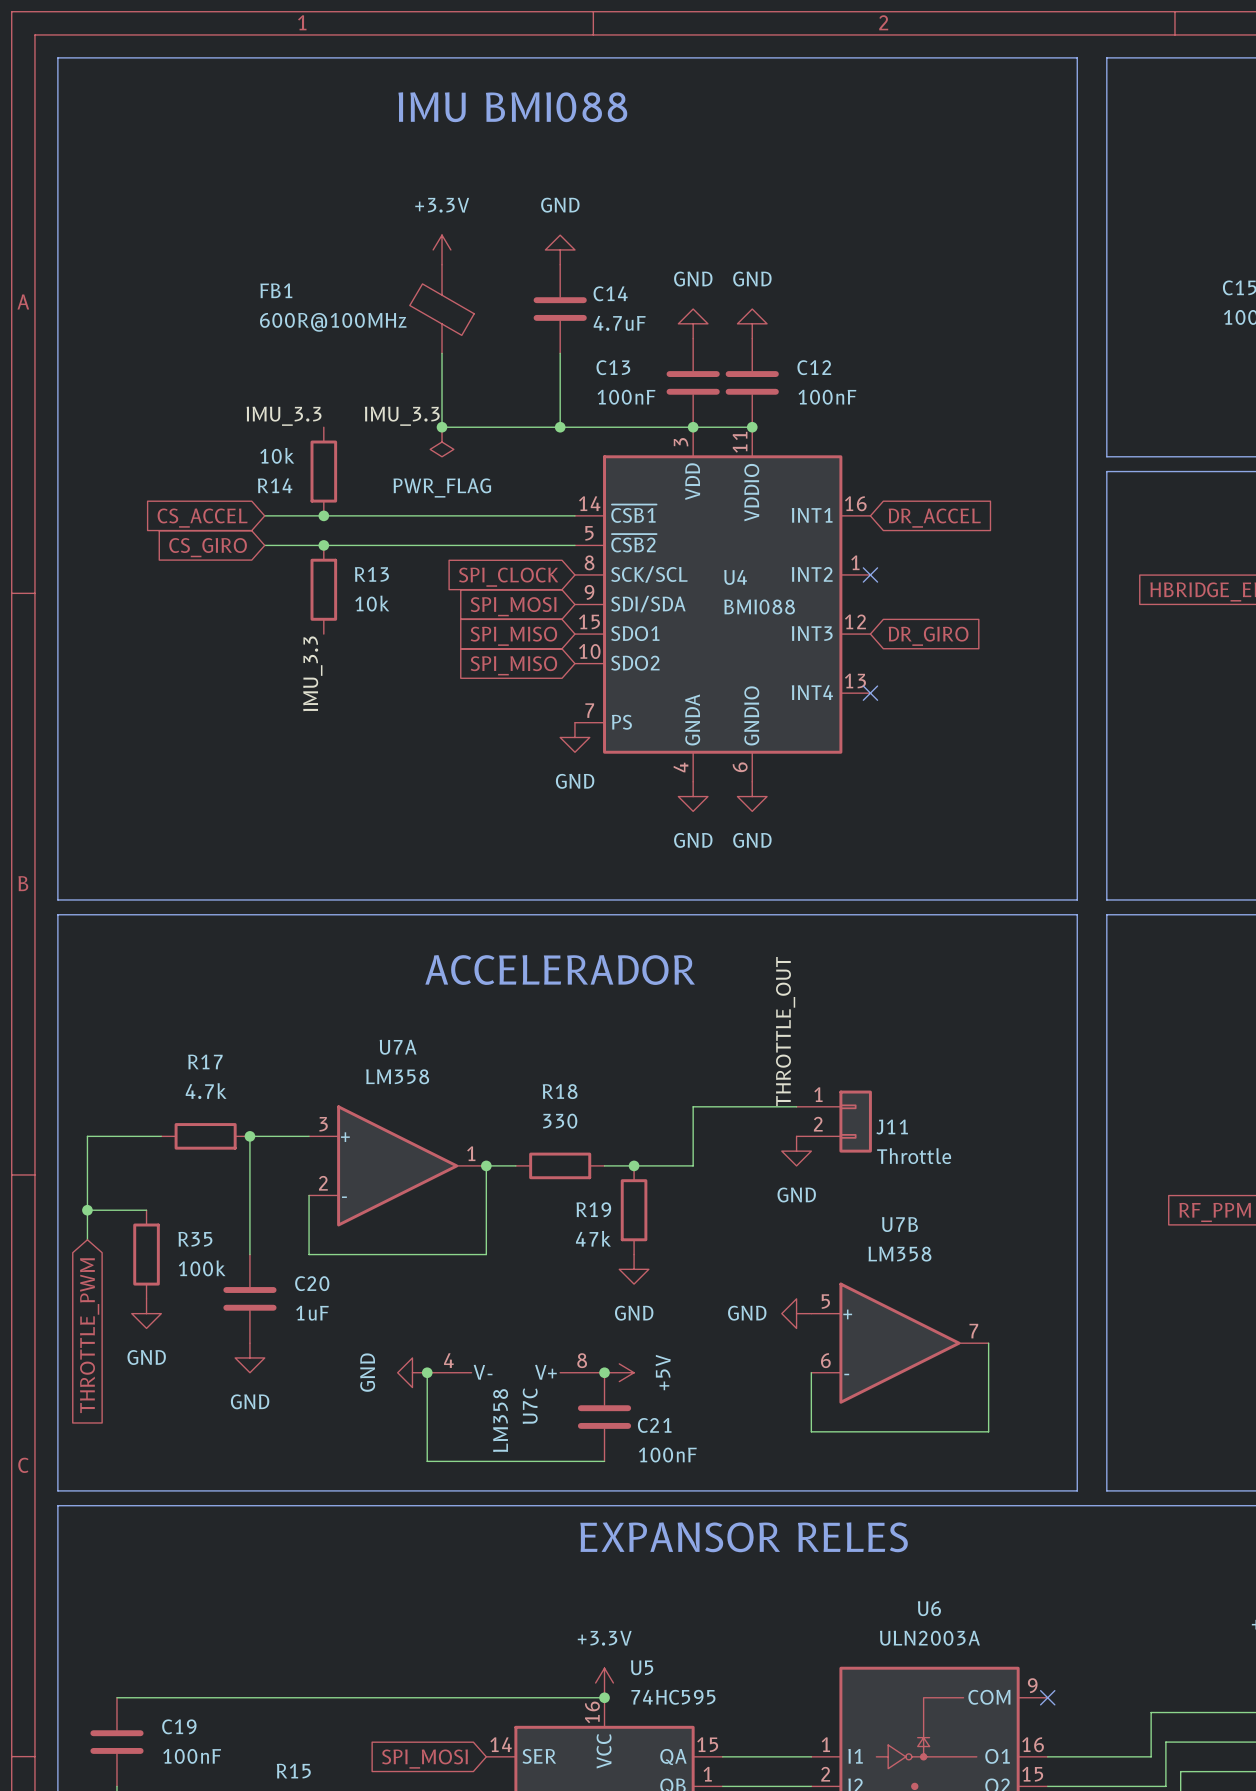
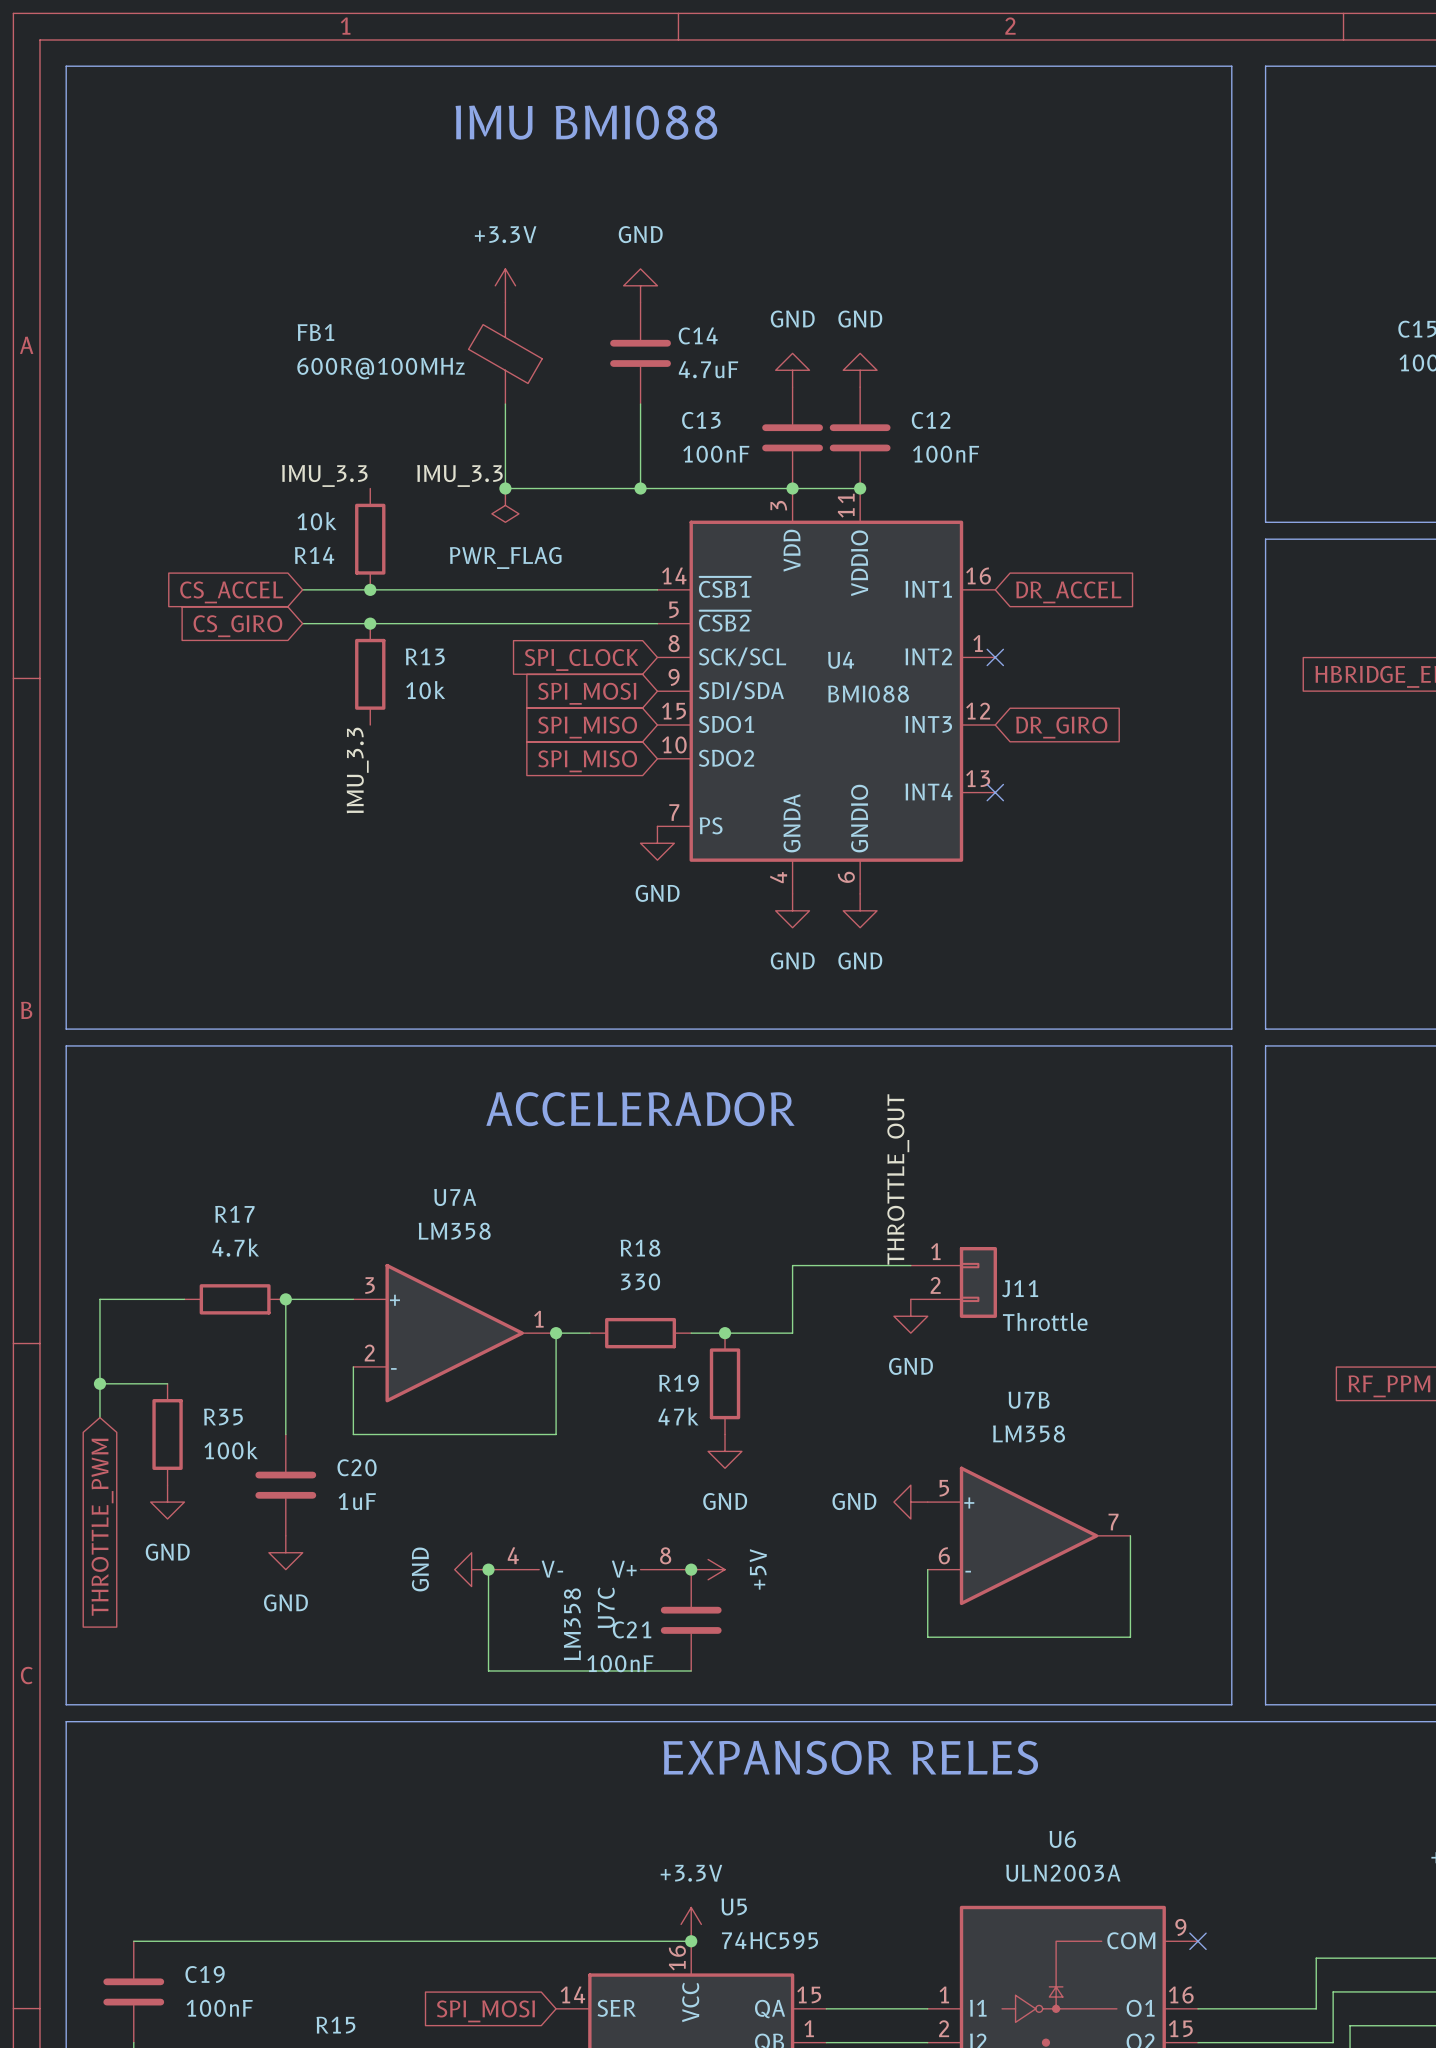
C21 name position: C21 (654, 1425) -> C21 (632, 1629)
C21 value position: 100nF (667, 1455) -> 100nF (620, 1663)

